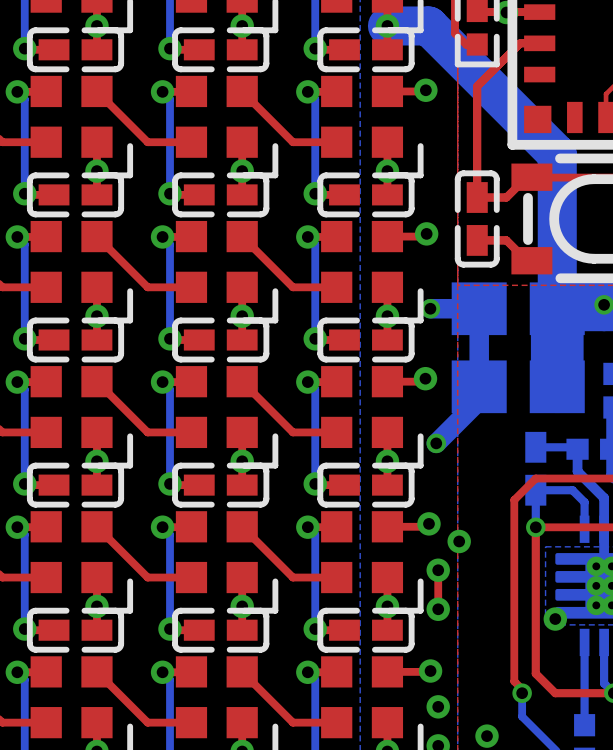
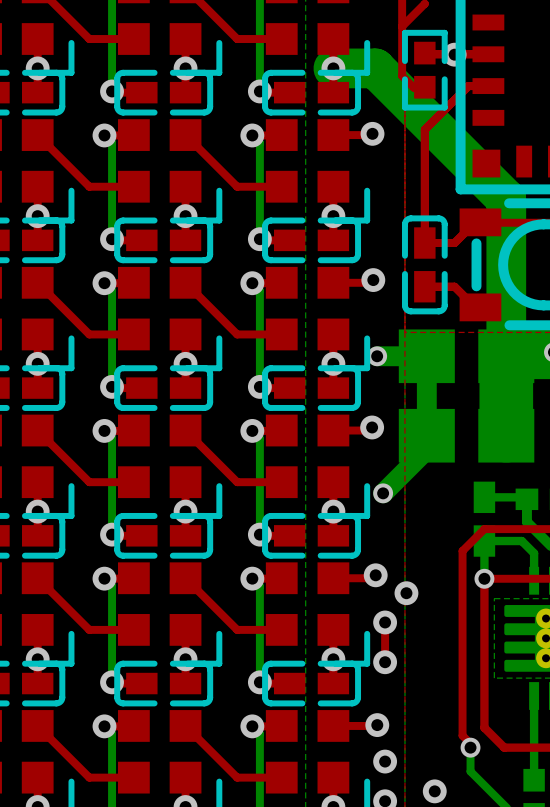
via: (555, 619) -> none

